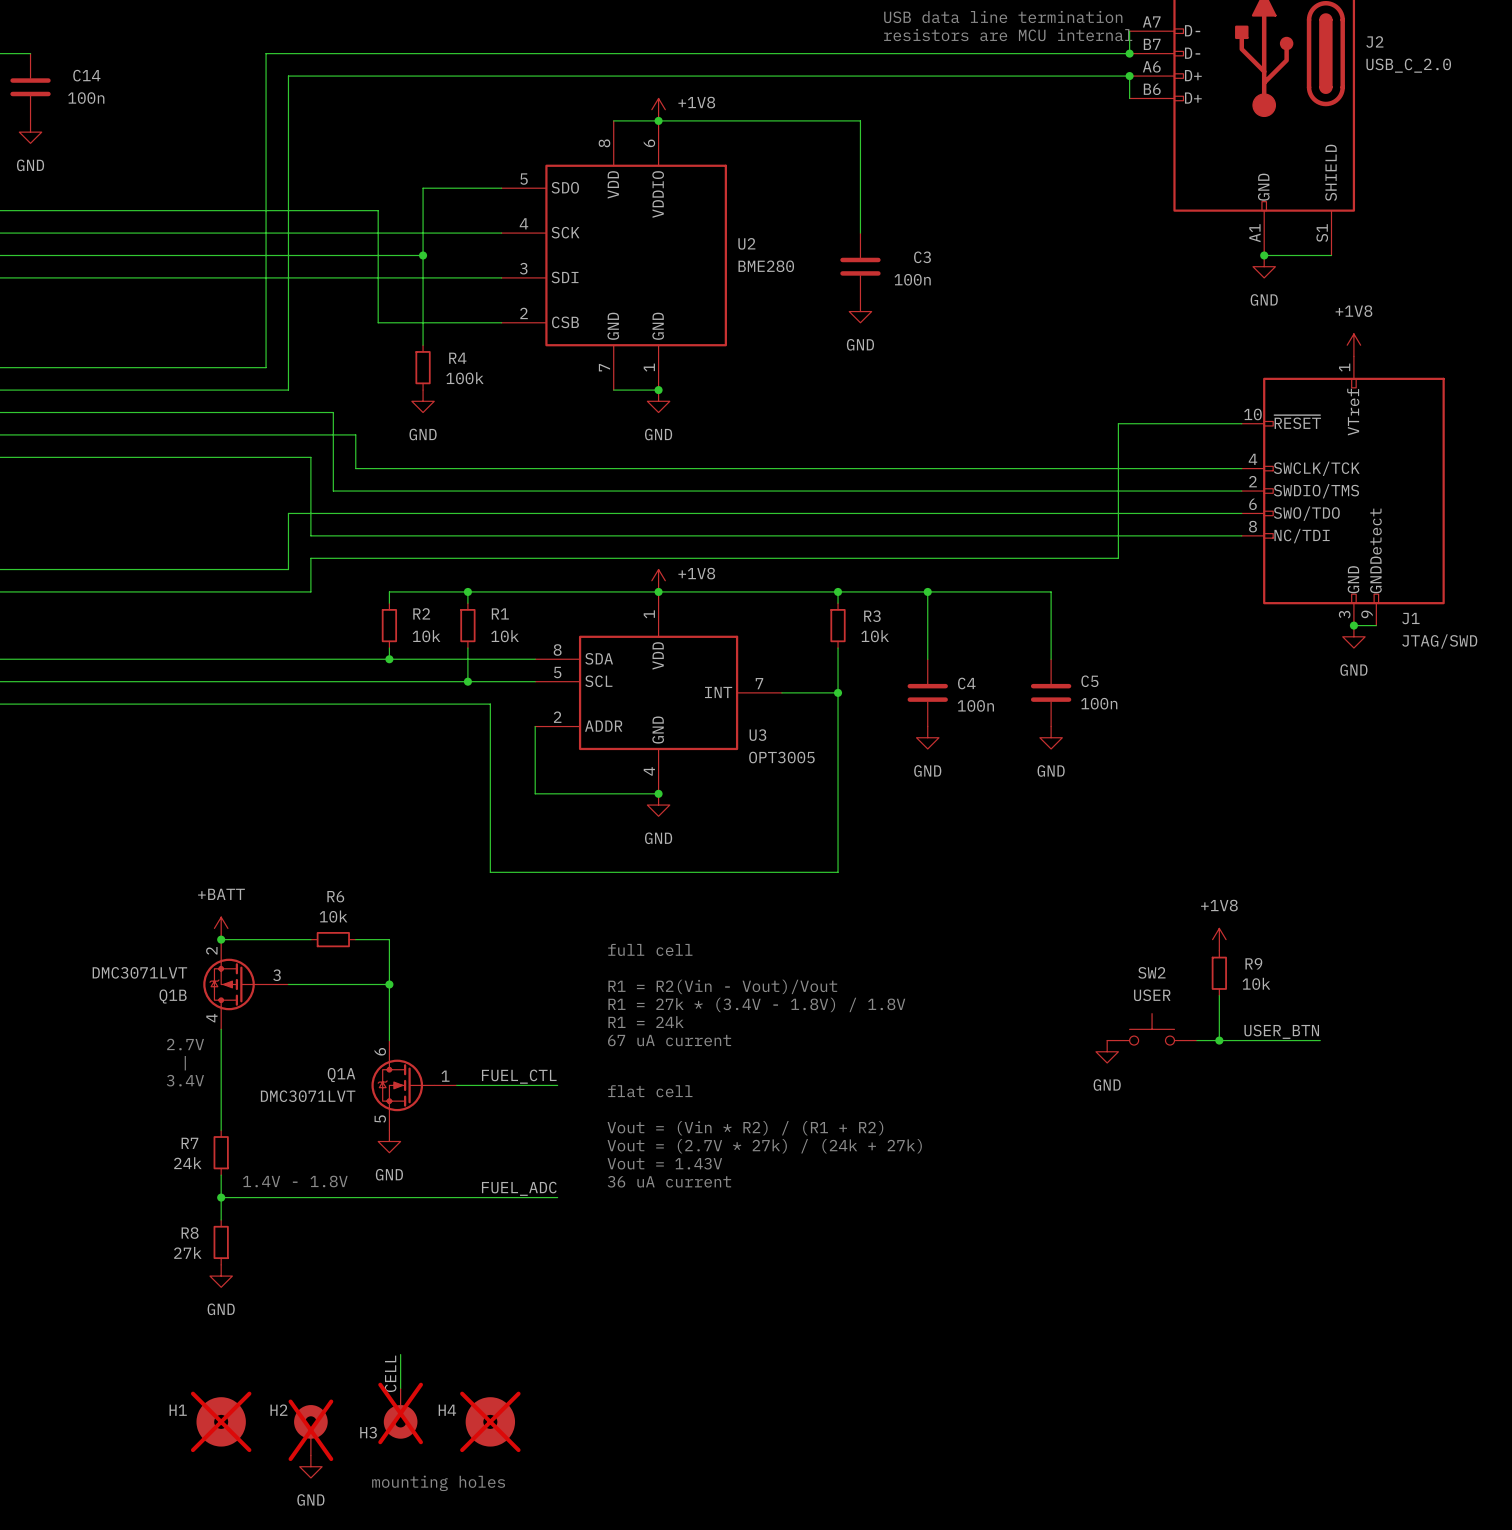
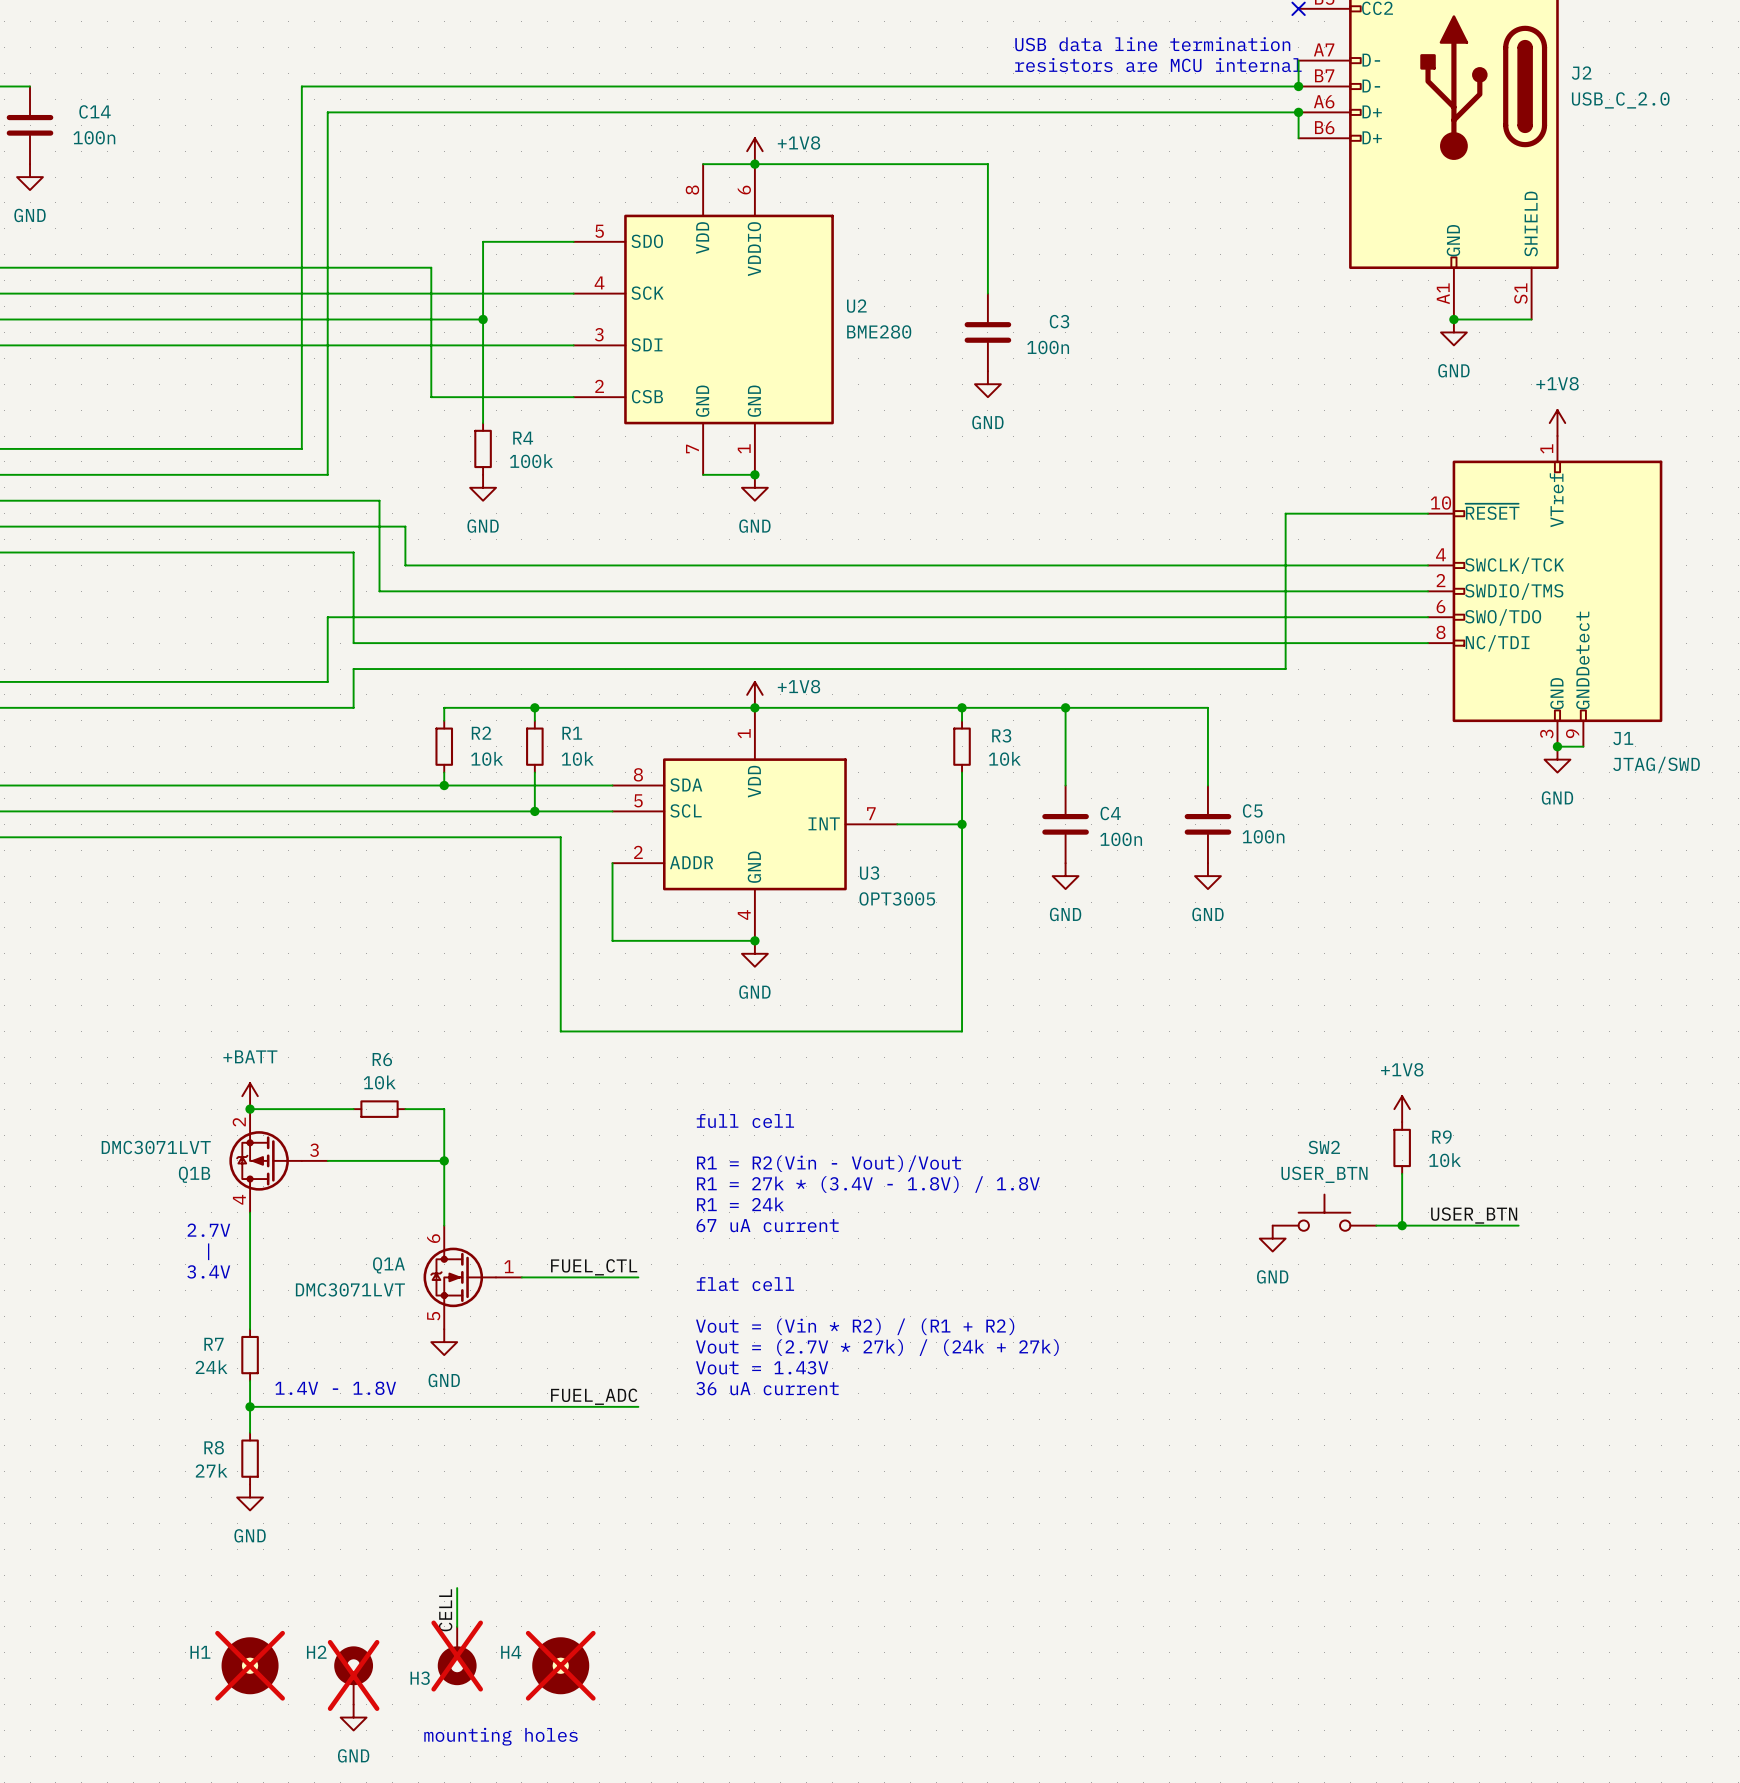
SW2 value: USER (1152, 995) -> USER_BTN (1324, 1174)

